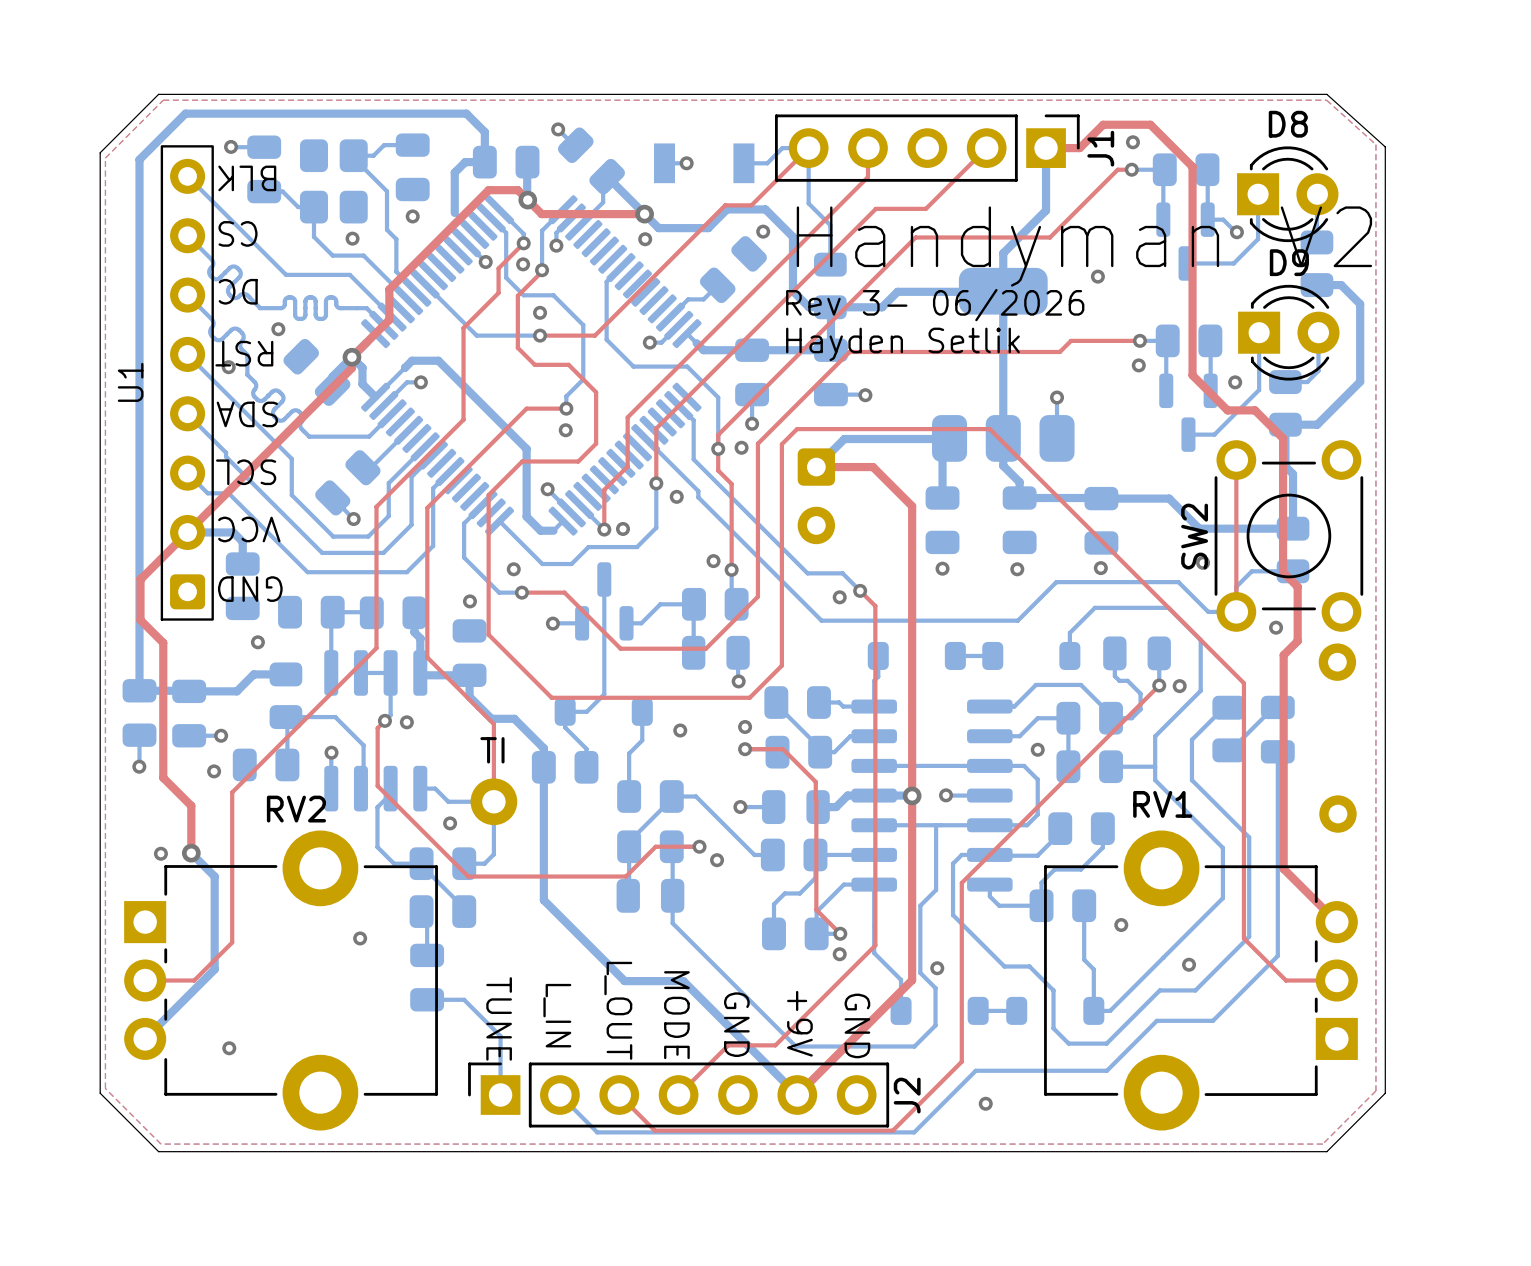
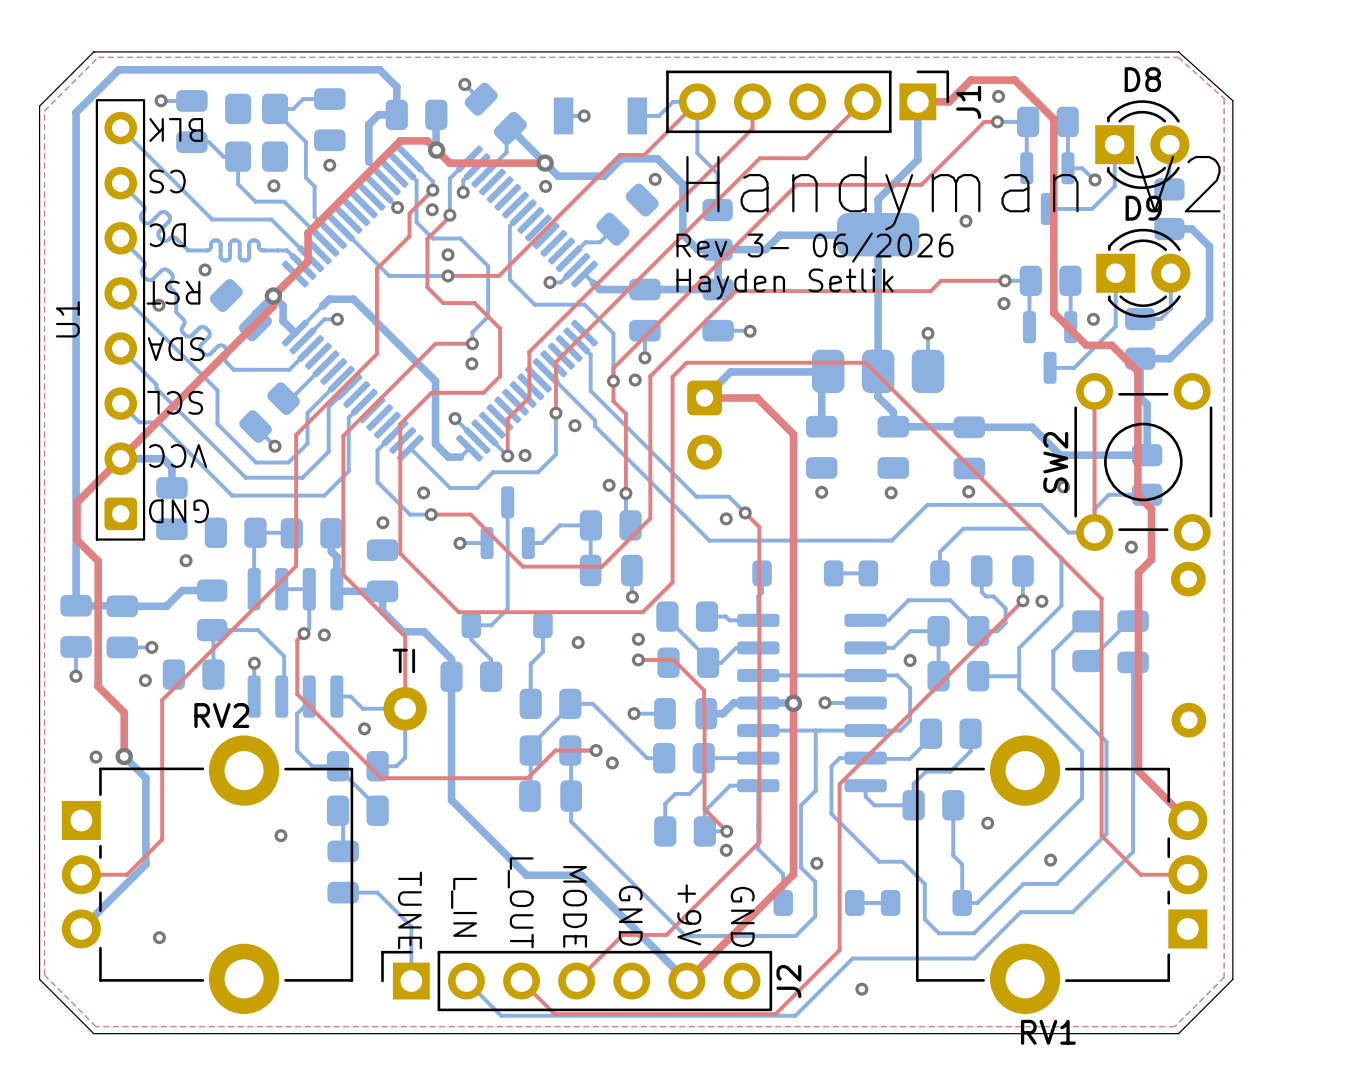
RV1 name position: RV1 (1162, 804) -> RV1 (1048, 1032)

